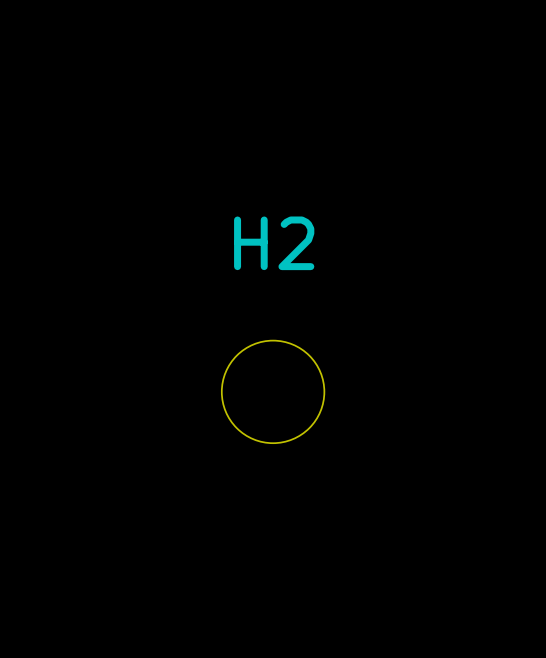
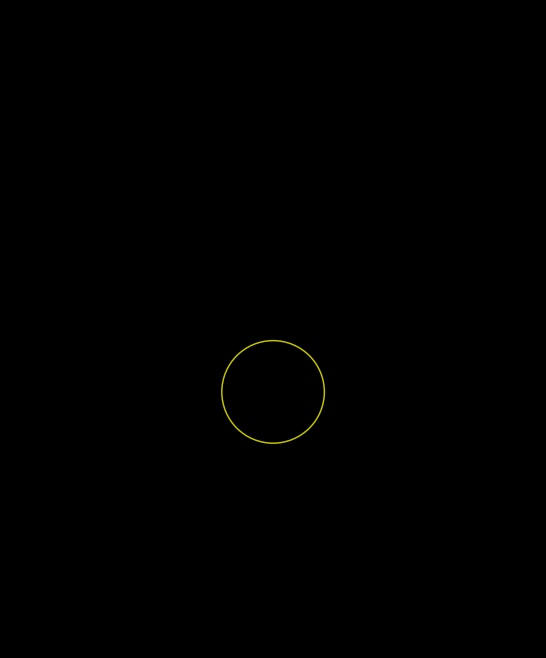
H2 name: H2 (274, 243) -> none

